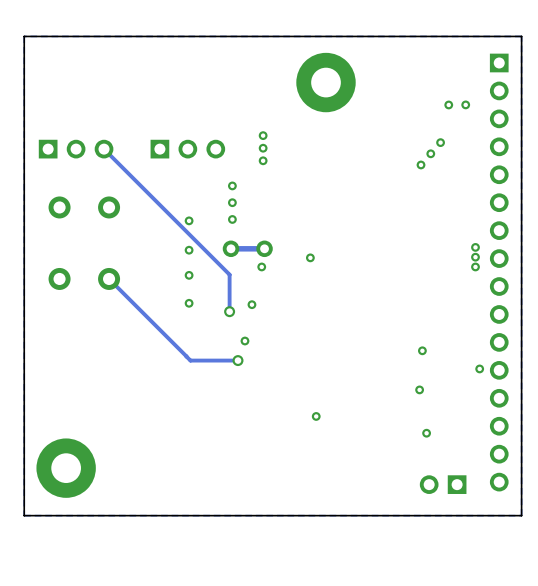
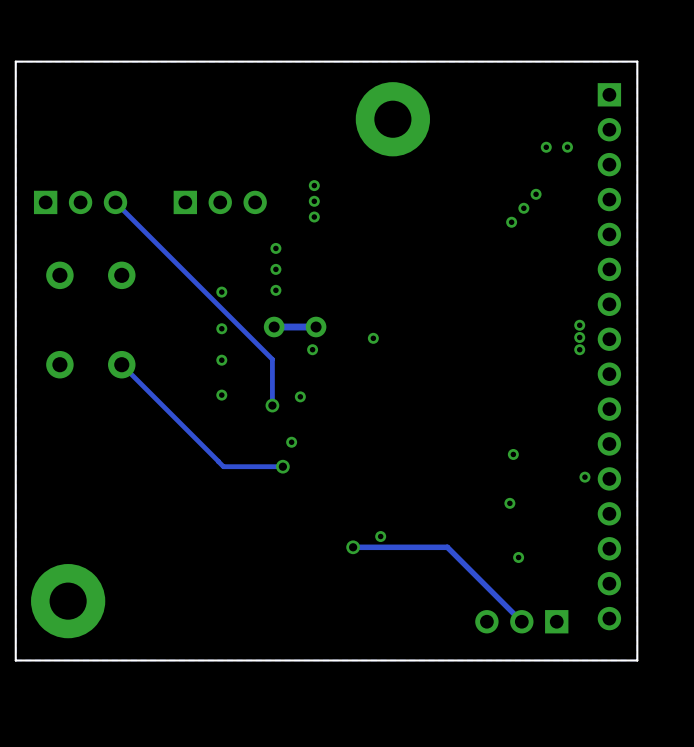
track: none -> (353, 547) (447, 547) (521, 621)
via: none -> (353, 547)
part: none -> (521, 621)
part: (443, 484) -> none

